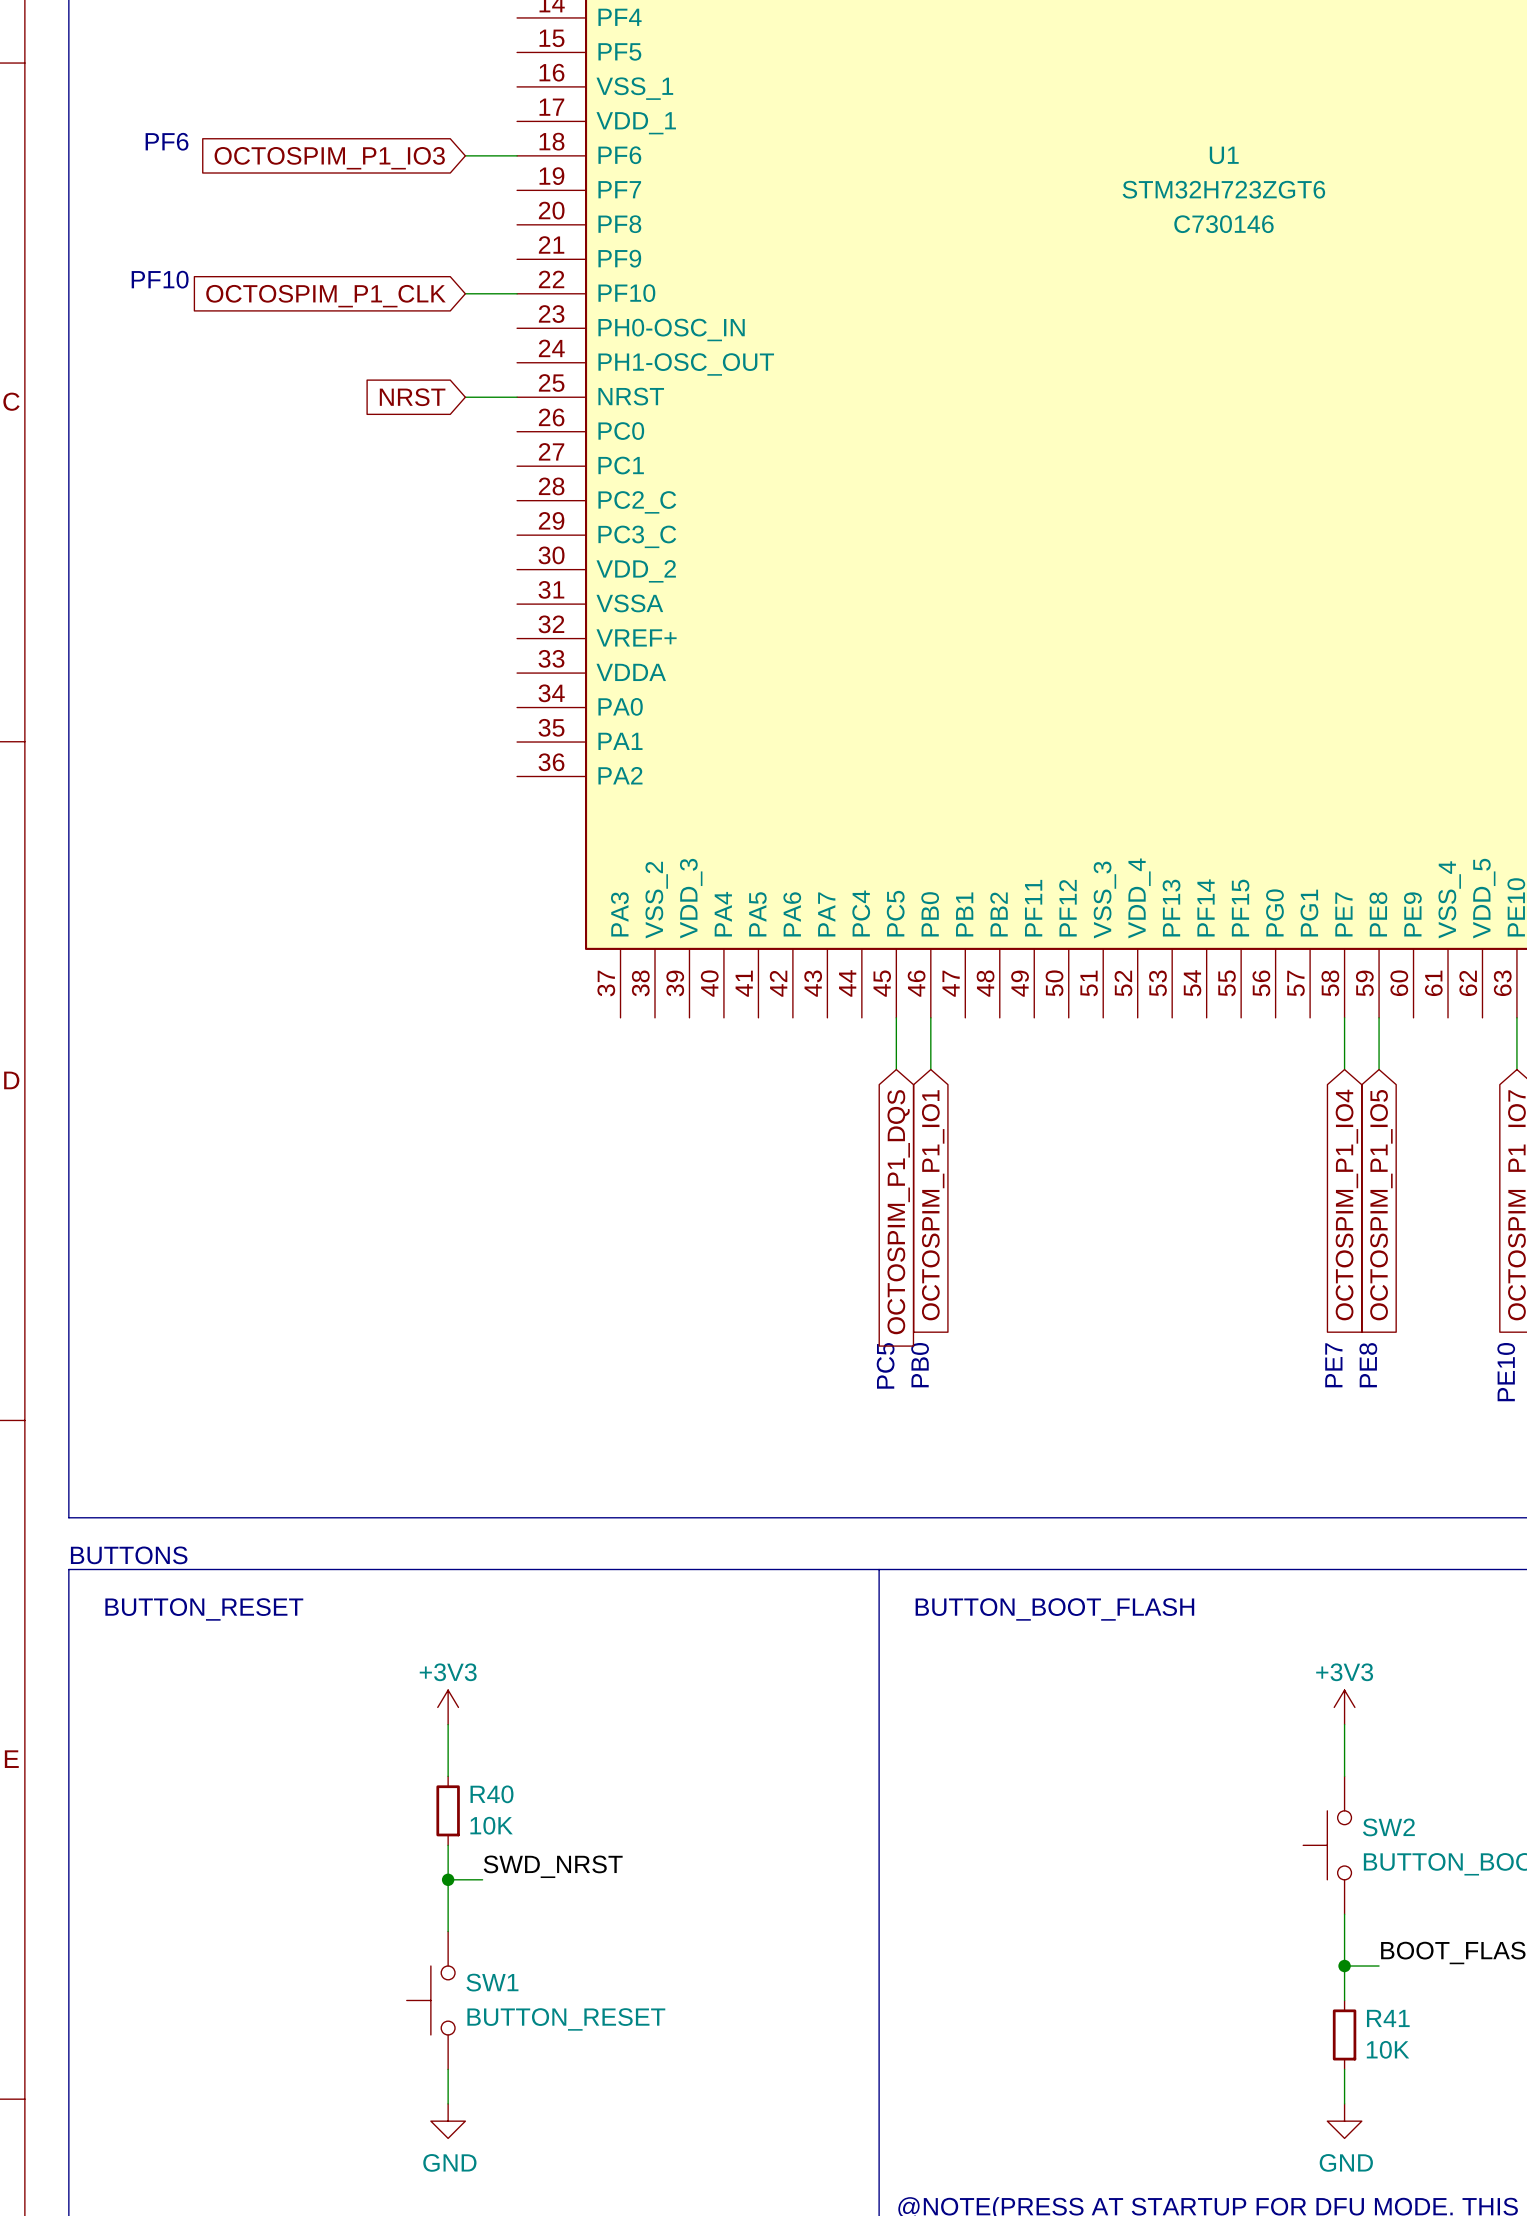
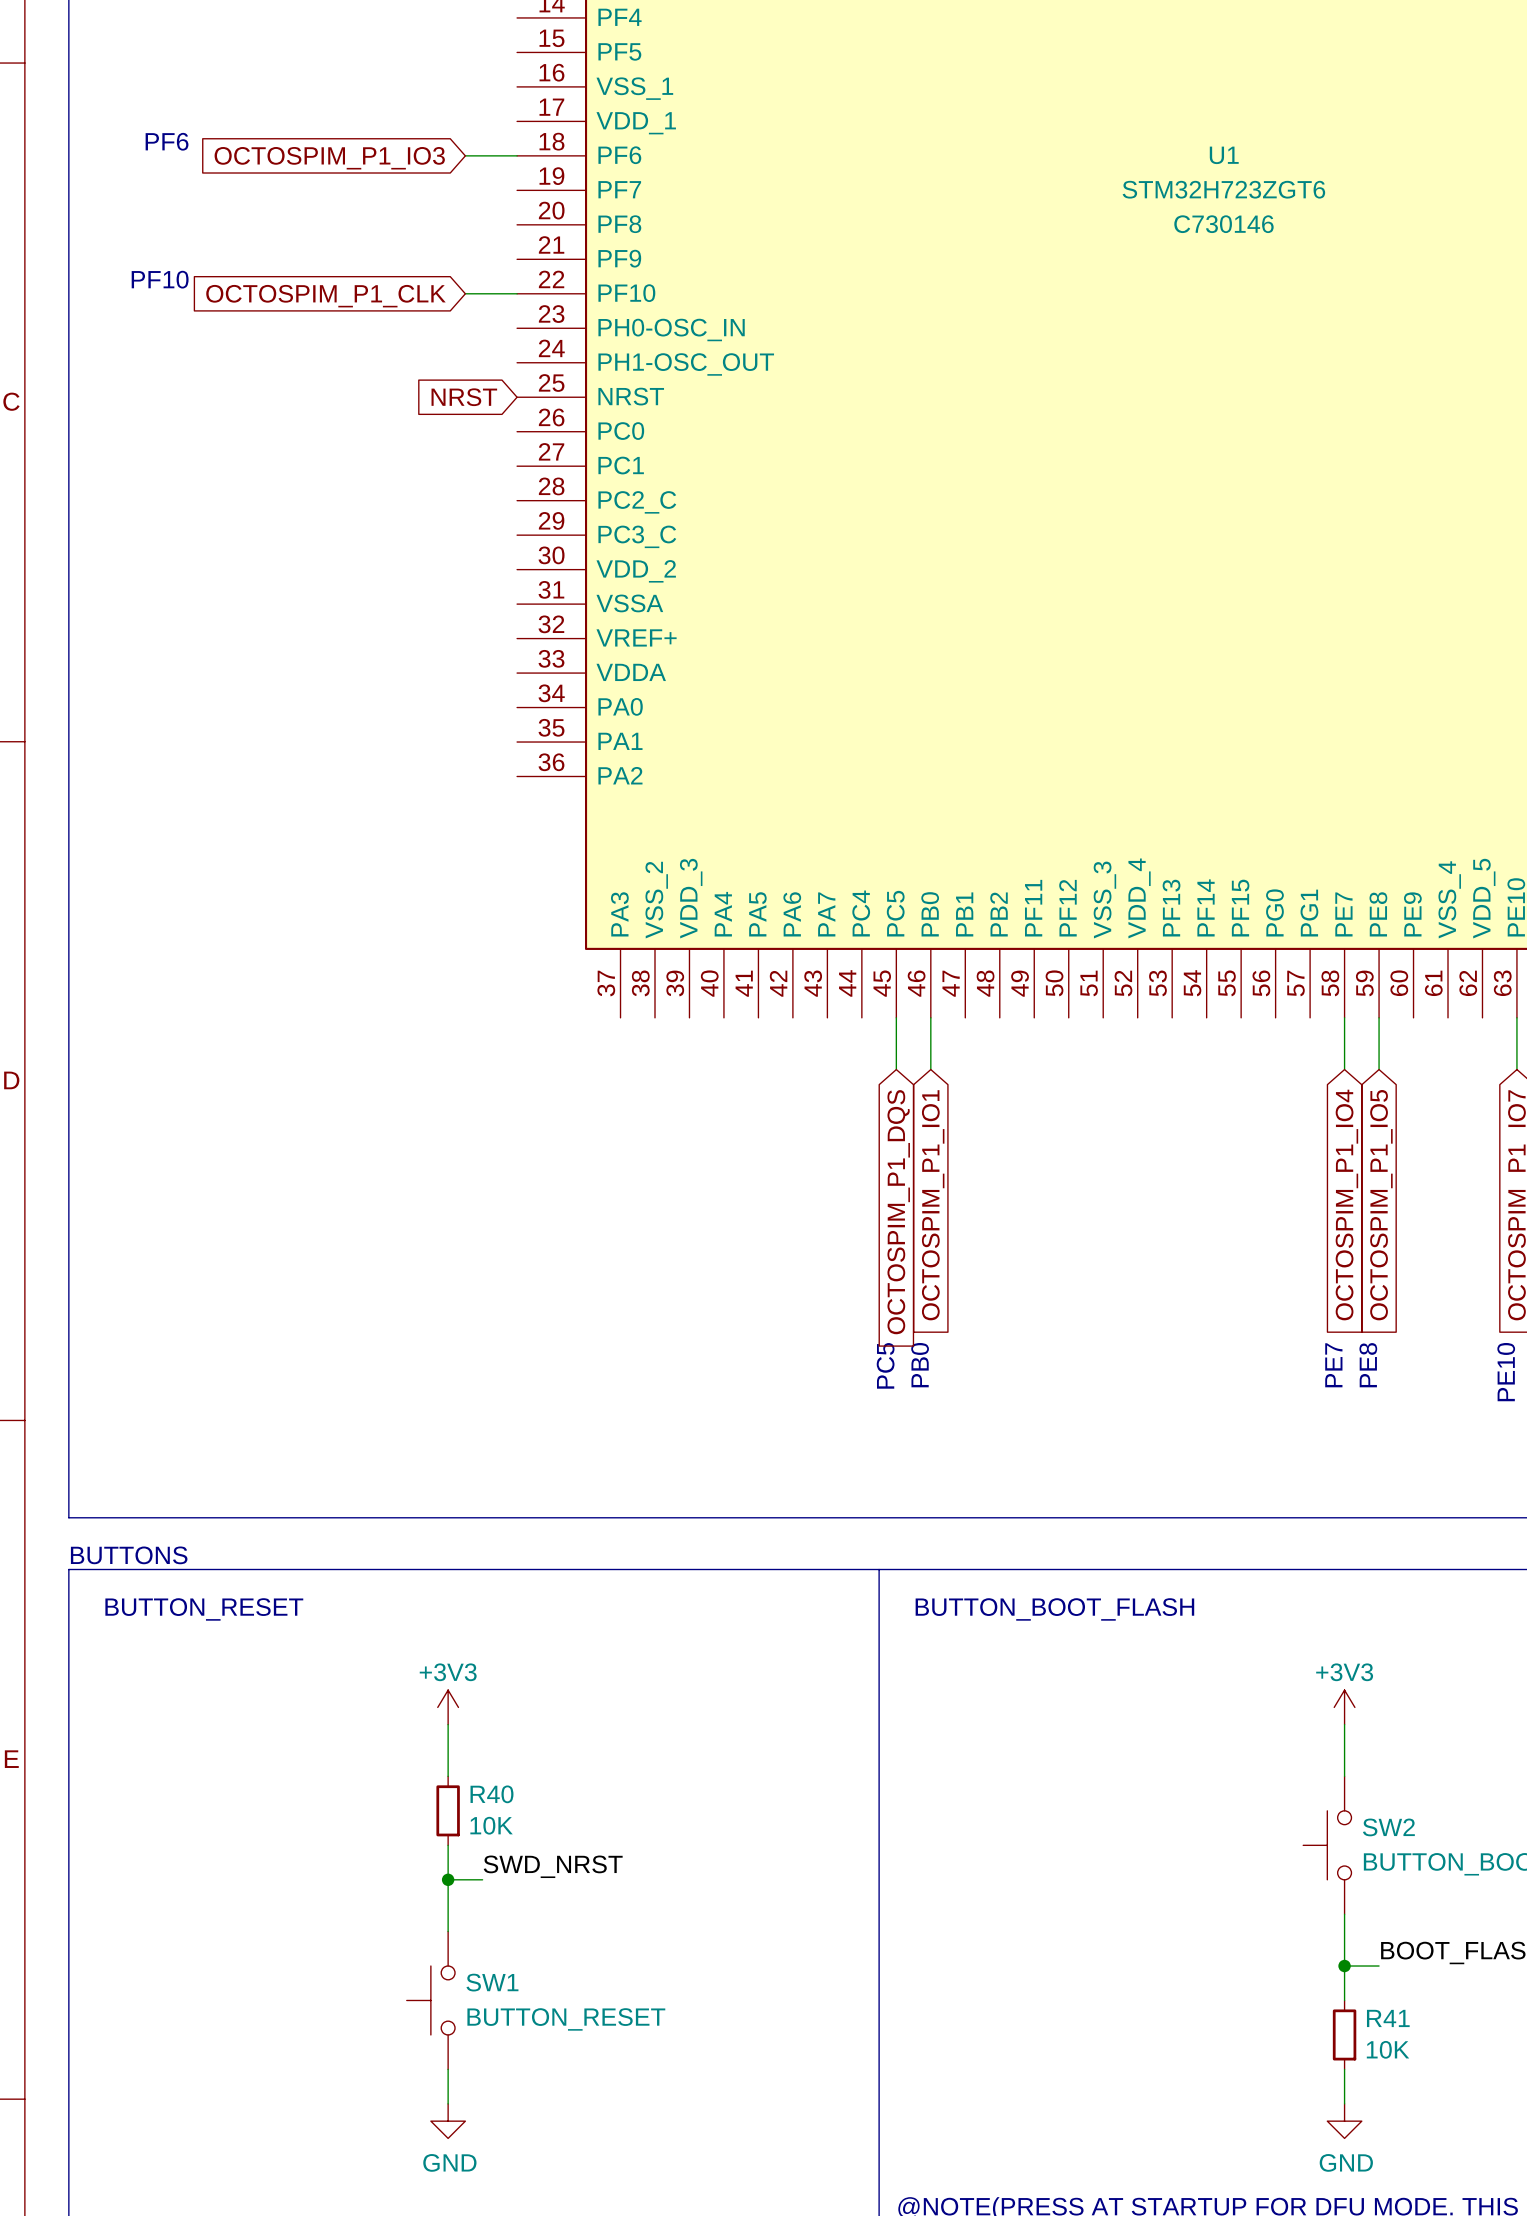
global label position: NRST (412, 397) -> NRST (464, 397)
wire: (465, 397) (517, 397) -> none

